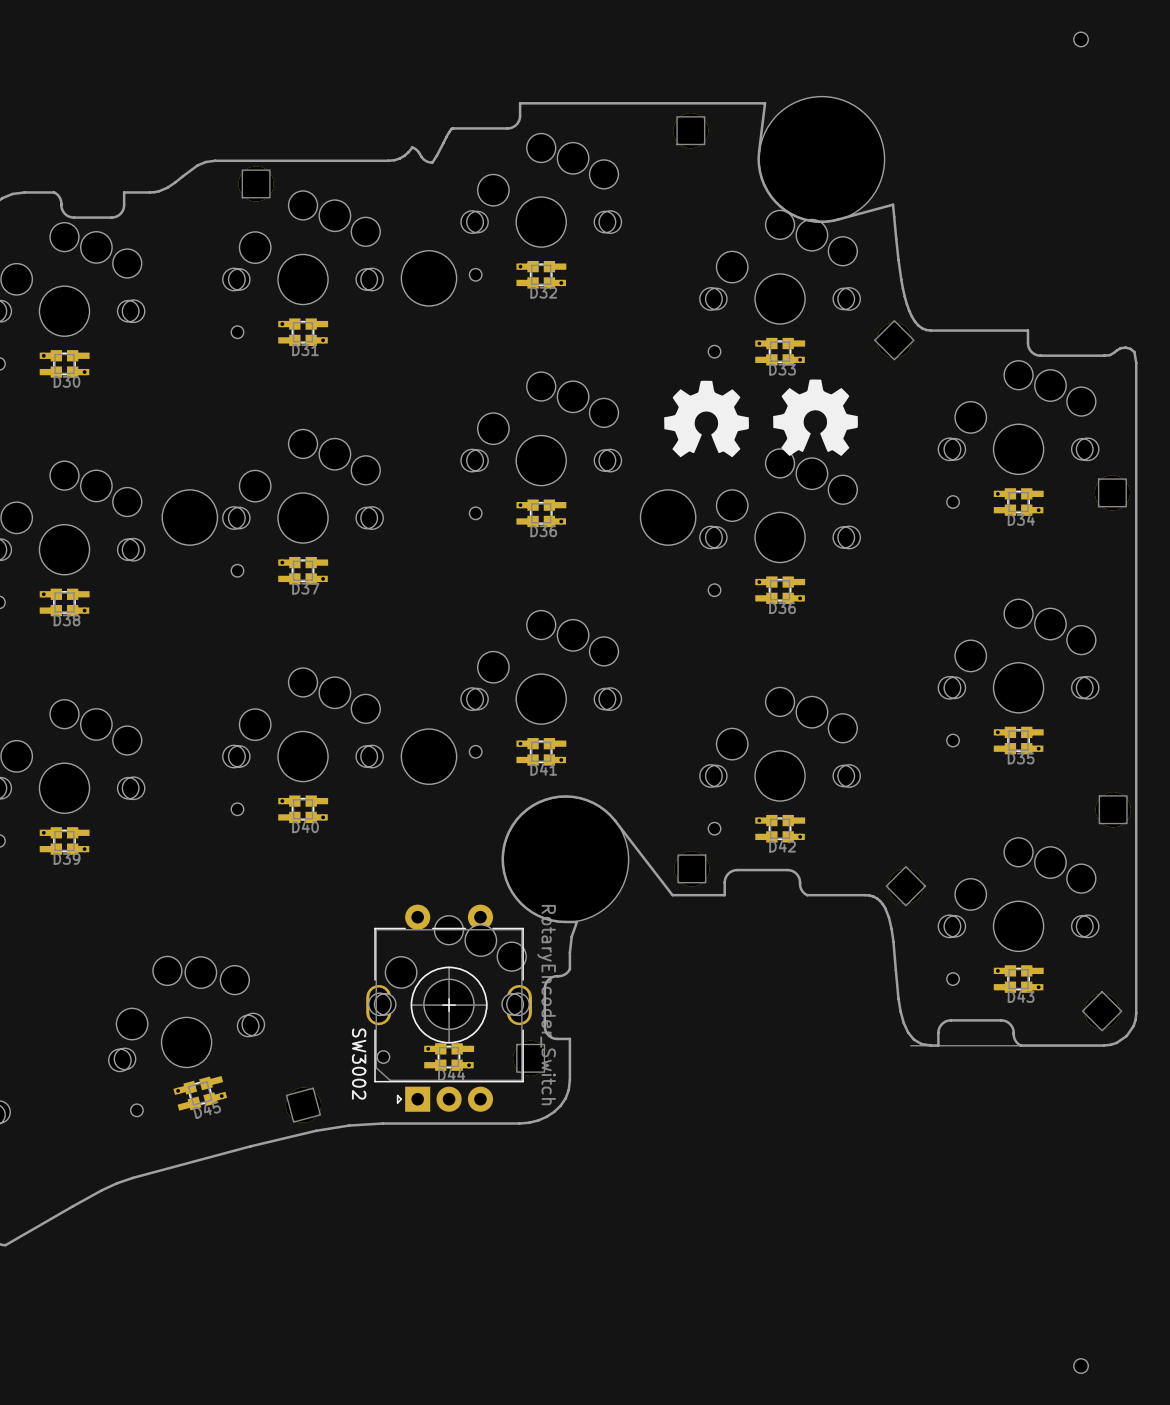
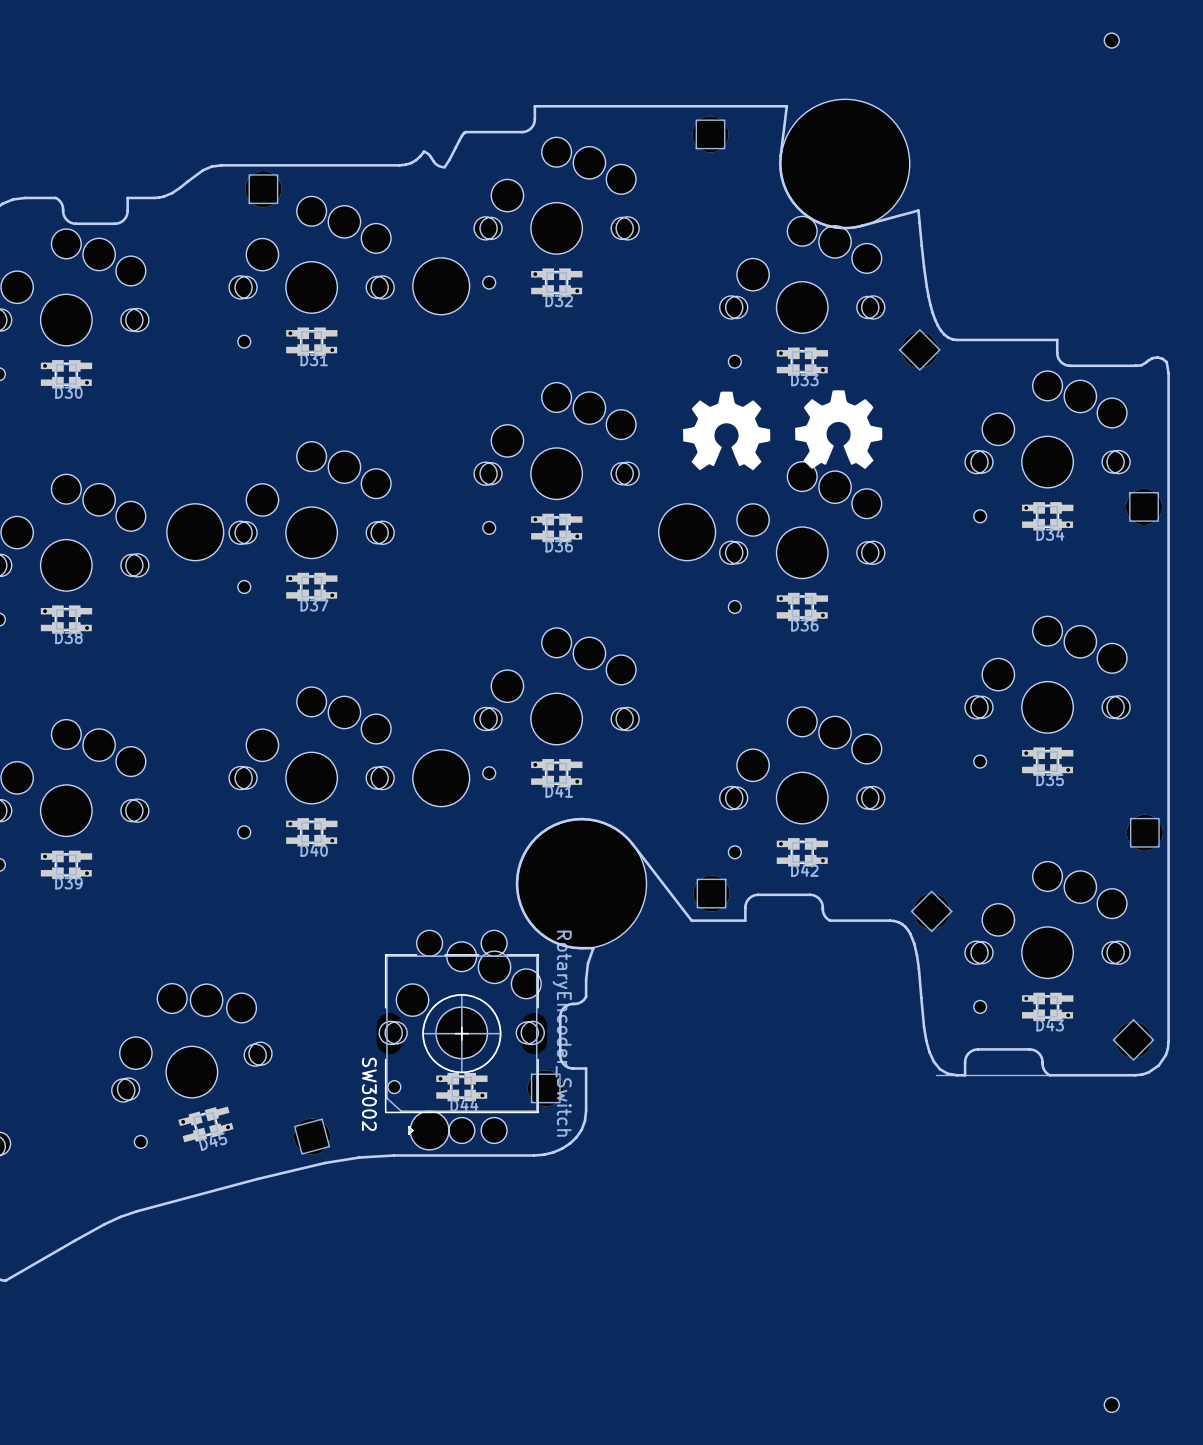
SW3002 footprint: [366, 904, 532, 1112] -> [376, 930, 548, 1150]

